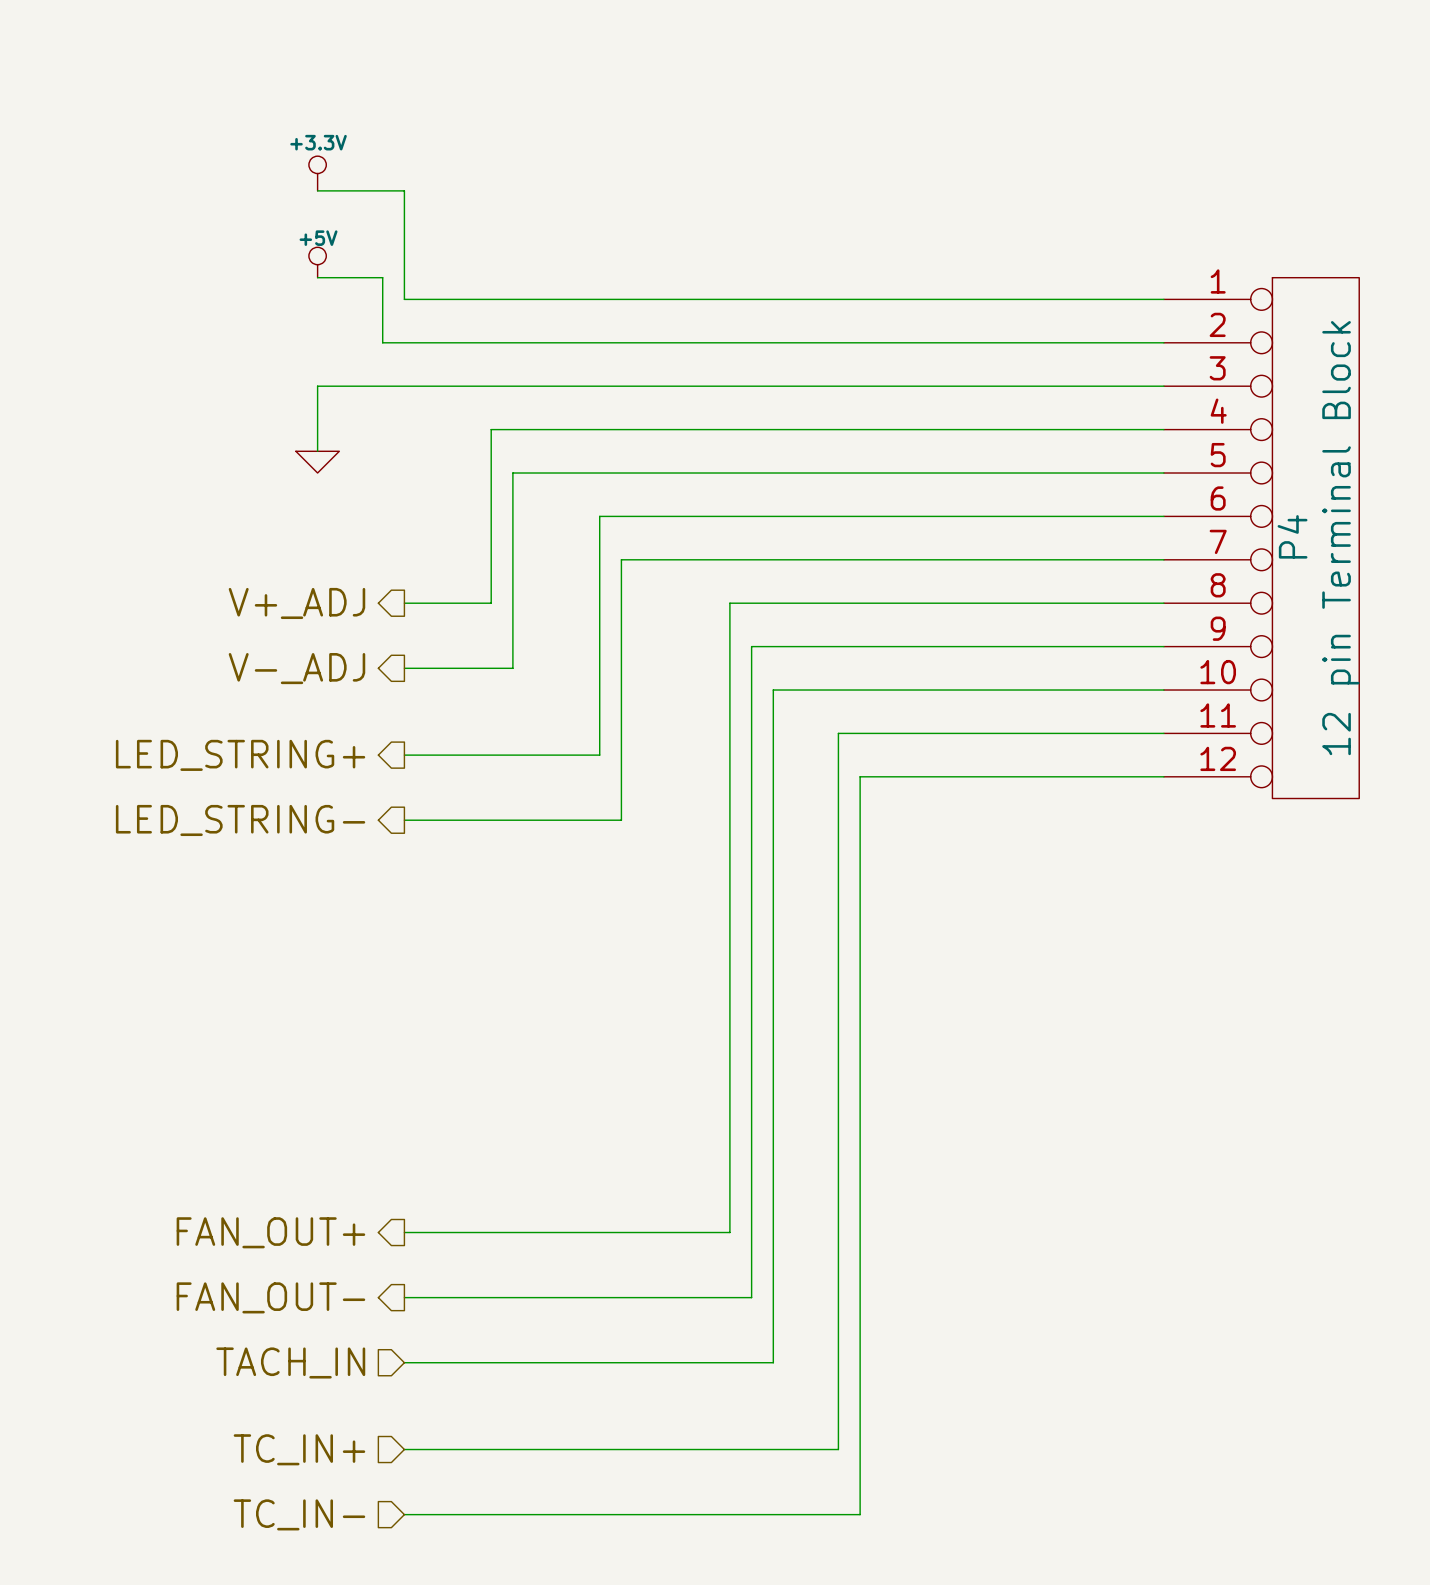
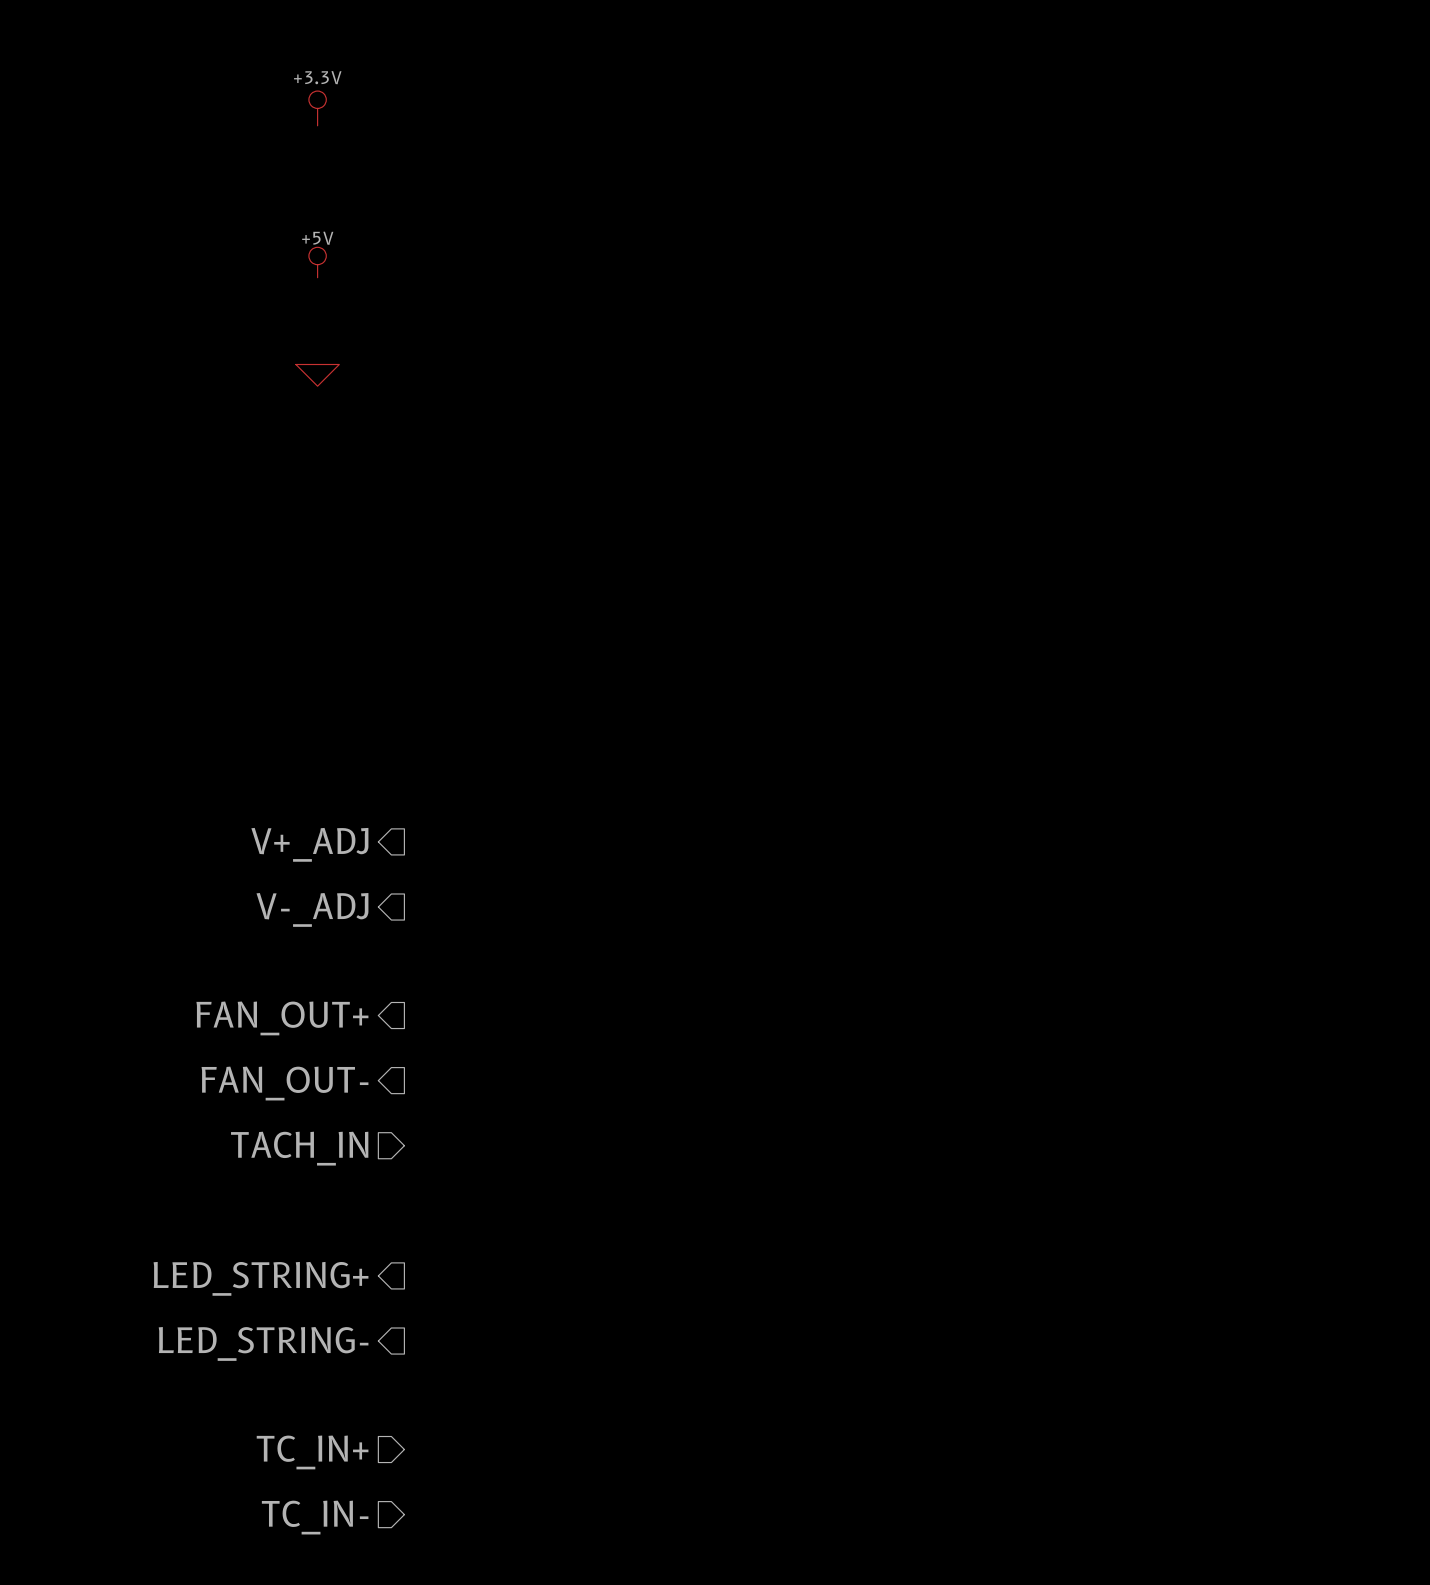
power symbol position: +3.3V (317, 173) -> +3.3V (317, 108)
wire: (317, 190) (404, 190) (404, 299) (1163, 299) -> none
wire: (317, 277) (382, 277) (382, 342) (1163, 342) -> none
wire: (1163, 386) (317, 386) (317, 451) -> none
wire: (1163, 429) (491, 429) (491, 603) (404, 603) -> none
power symbol position: (317, 462) -> (317, 375)
wire: (1163, 473) (512, 473) (512, 668) (404, 668) -> none
wire: (1163, 516) (599, 516) (599, 755) (404, 755) -> none
P4: 12 pin Terminal Block (1261, 538) -> none
wire: (1163, 559) (621, 559) (621, 820) (404, 820) -> none
hierarchical label position: V+_ADJ (296, 603) -> V+_ADJ (309, 844)
wire: (1163, 603) (729, 603) (729, 1232) (404, 1232) -> none
wire: (1163, 646) (751, 646) (751, 1297) (404, 1297) -> none
hierarchical label position: V-_ADJ (296, 668) -> V-_ADJ (312, 909)
wire: (1163, 690) (773, 690) (773, 1362) (404, 1362) -> none
wire: (1163, 733) (838, 733) (838, 1449) (404, 1449) -> none
hierarchical label: LED_STRING+ (240, 755) -> none
wire: (1163, 776) (860, 776) (860, 1514) (404, 1514) -> none
hierarchical label: LED_STRING- (240, 820) -> none
hierarchical label position: FAN_OUT+ (270, 1232) -> FAN_OUT+ (282, 1018)
hierarchical label: none -> LED_STRING+ (261, 1278)
hierarchical label position: FAN_OUT- (270, 1297) -> FAN_OUT- (284, 1083)
hierarchical label: none -> LED_STRING- (263, 1343)
hierarchical label position: TACH_IN (290, 1362) -> TACH_IN (299, 1148)

